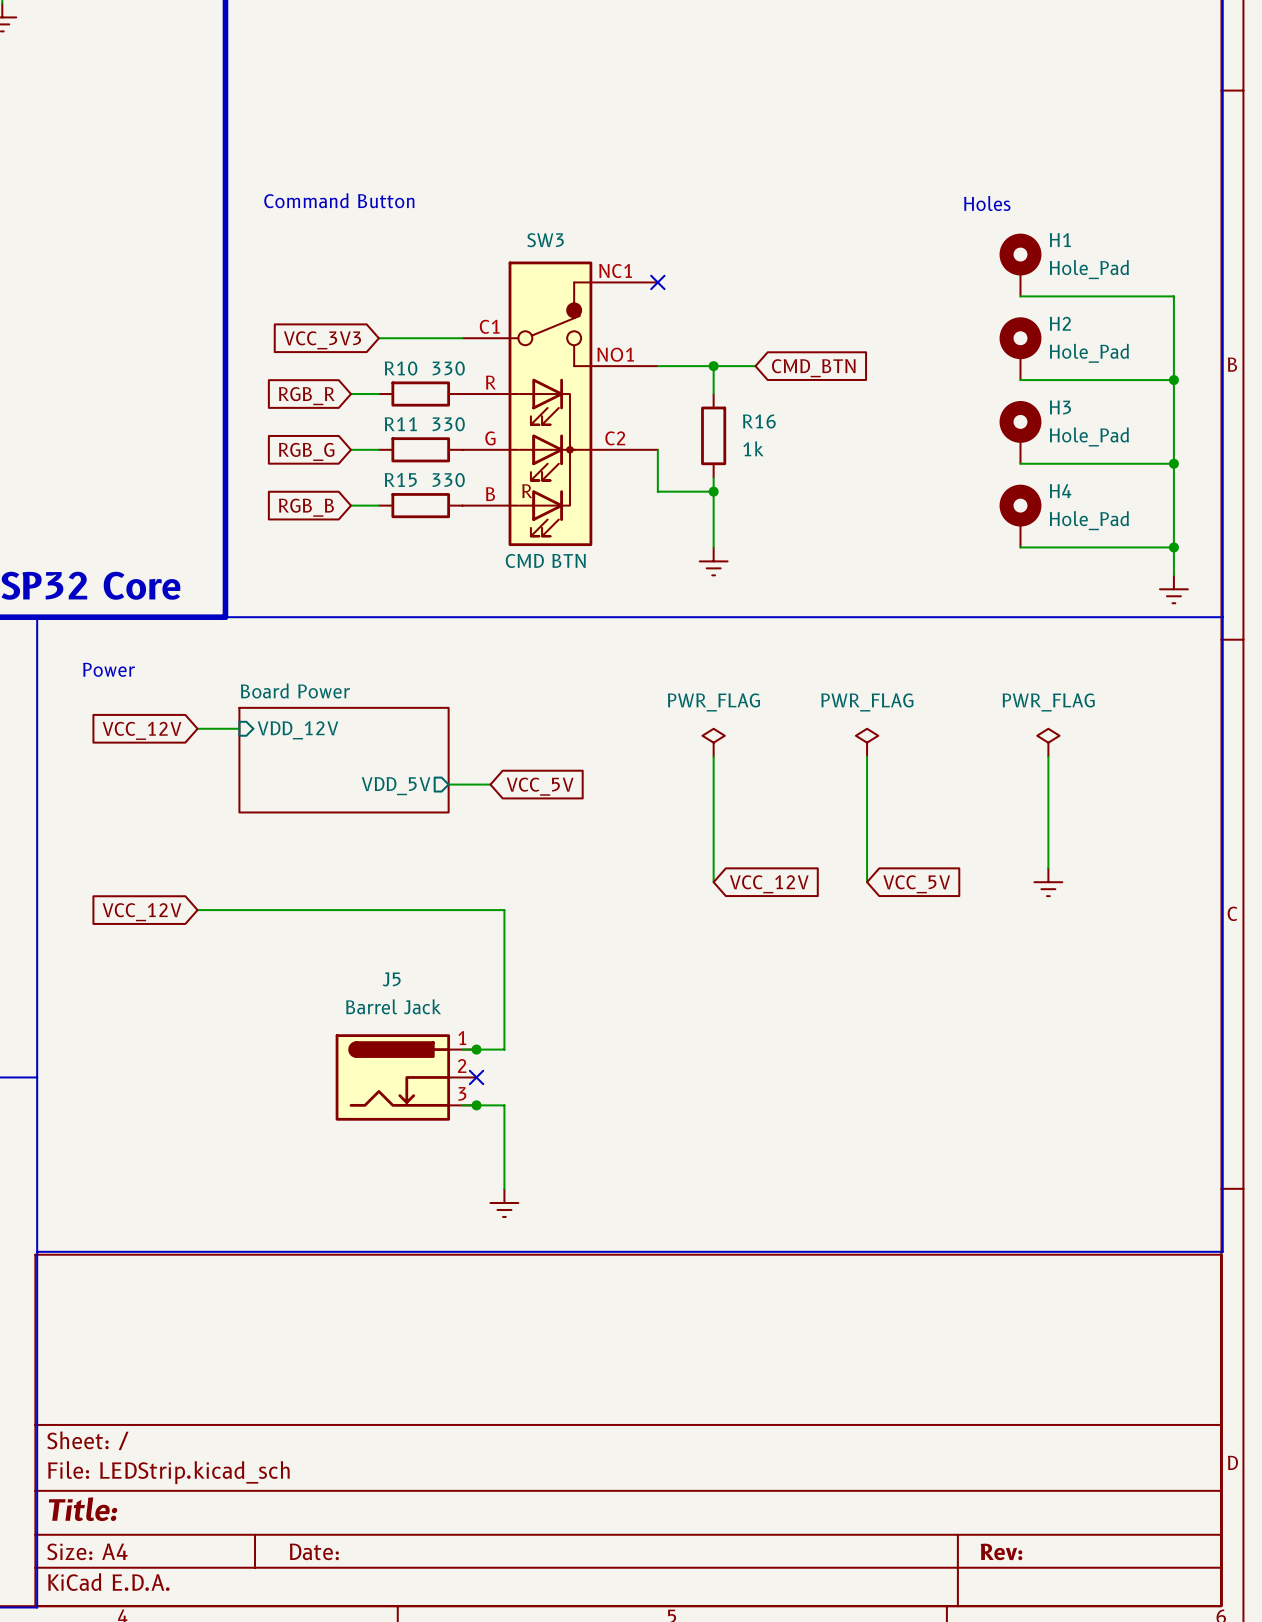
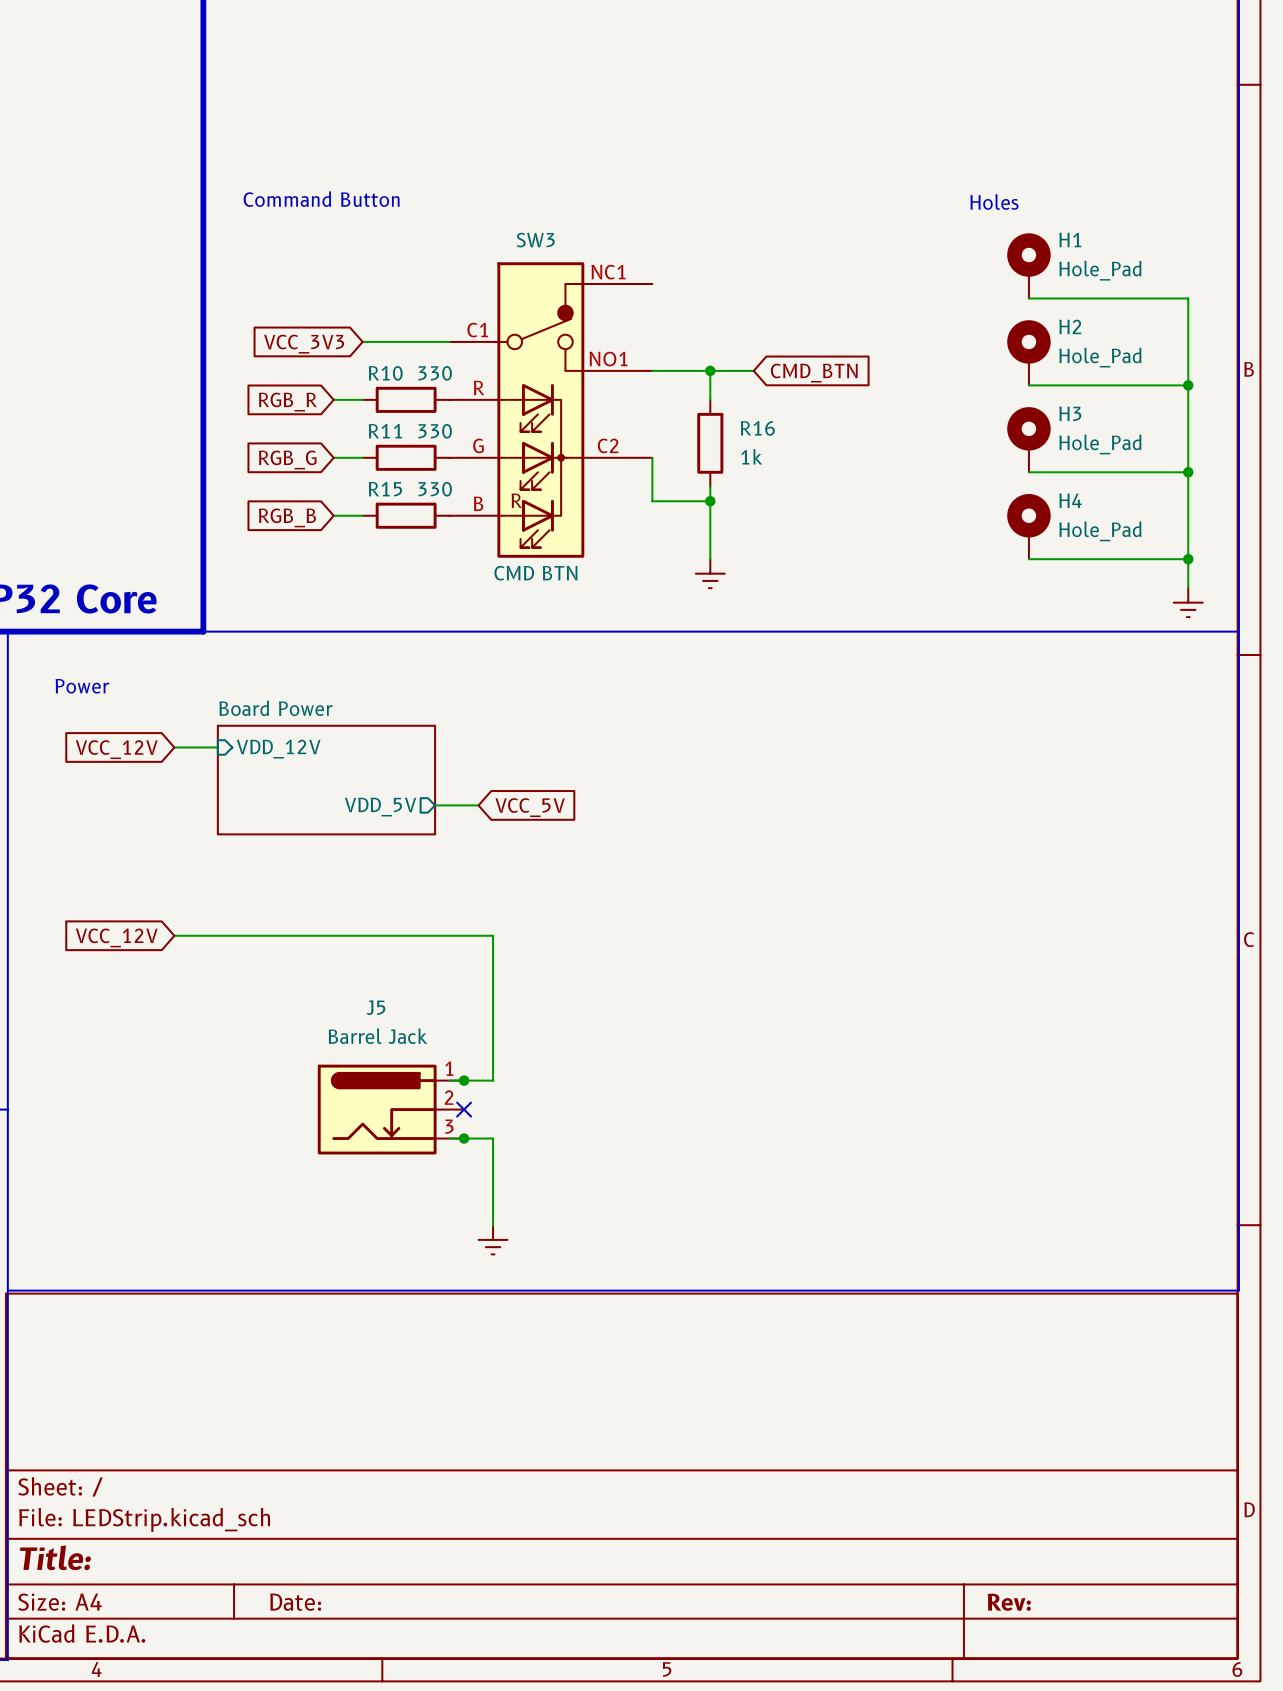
no-connect mark: (657, 282) -> none
power symbol: PWR_FLAG (713, 742) -> none
power symbol: PWR_FLAG (867, 742) -> none
power symbol: PWR_FLAG (1048, 742) -> none
wire: (713, 756) (713, 882) -> none
wire: (867, 756) (867, 882) -> none
wire: (1048, 756) (1048, 868) -> none
power symbol: (1048, 882) -> none
global label: VCC_12V (769, 884) -> none
global label: VCC_5V (916, 884) -> none

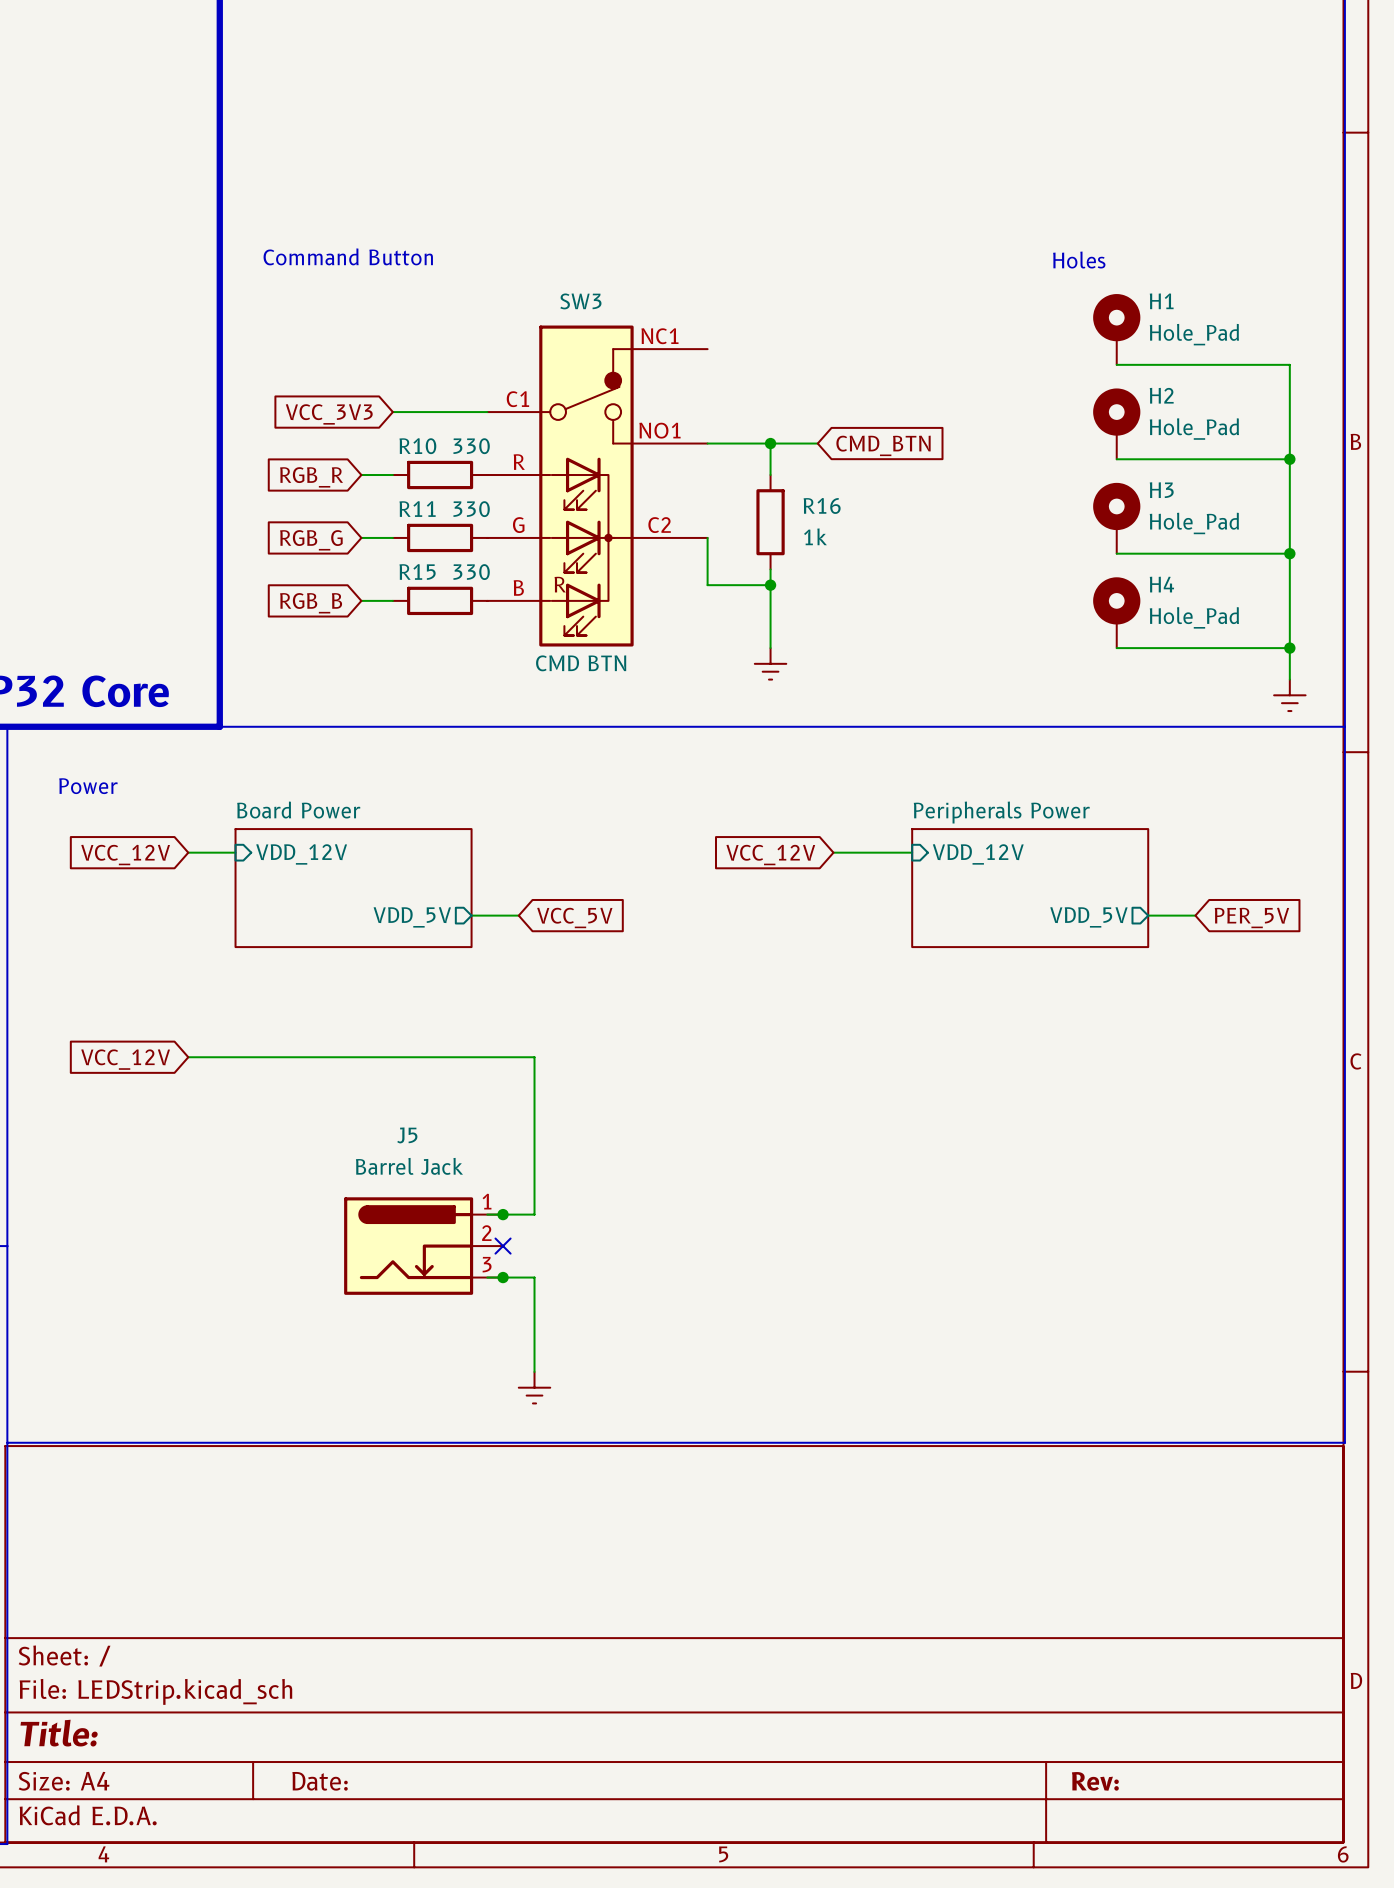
wire: none -> (833, 852) (912, 852)
global label: none -> VCC_12V (770, 855)
sheet pin: none -> VDD_12V (978, 854)
sheet Peripherals Power: none -> (1030, 888)
wire: none -> (1148, 915) (1195, 915)
sheet pin: none -> VDD_5V (1088, 917)
global label: none -> PER_5V (1251, 917)

